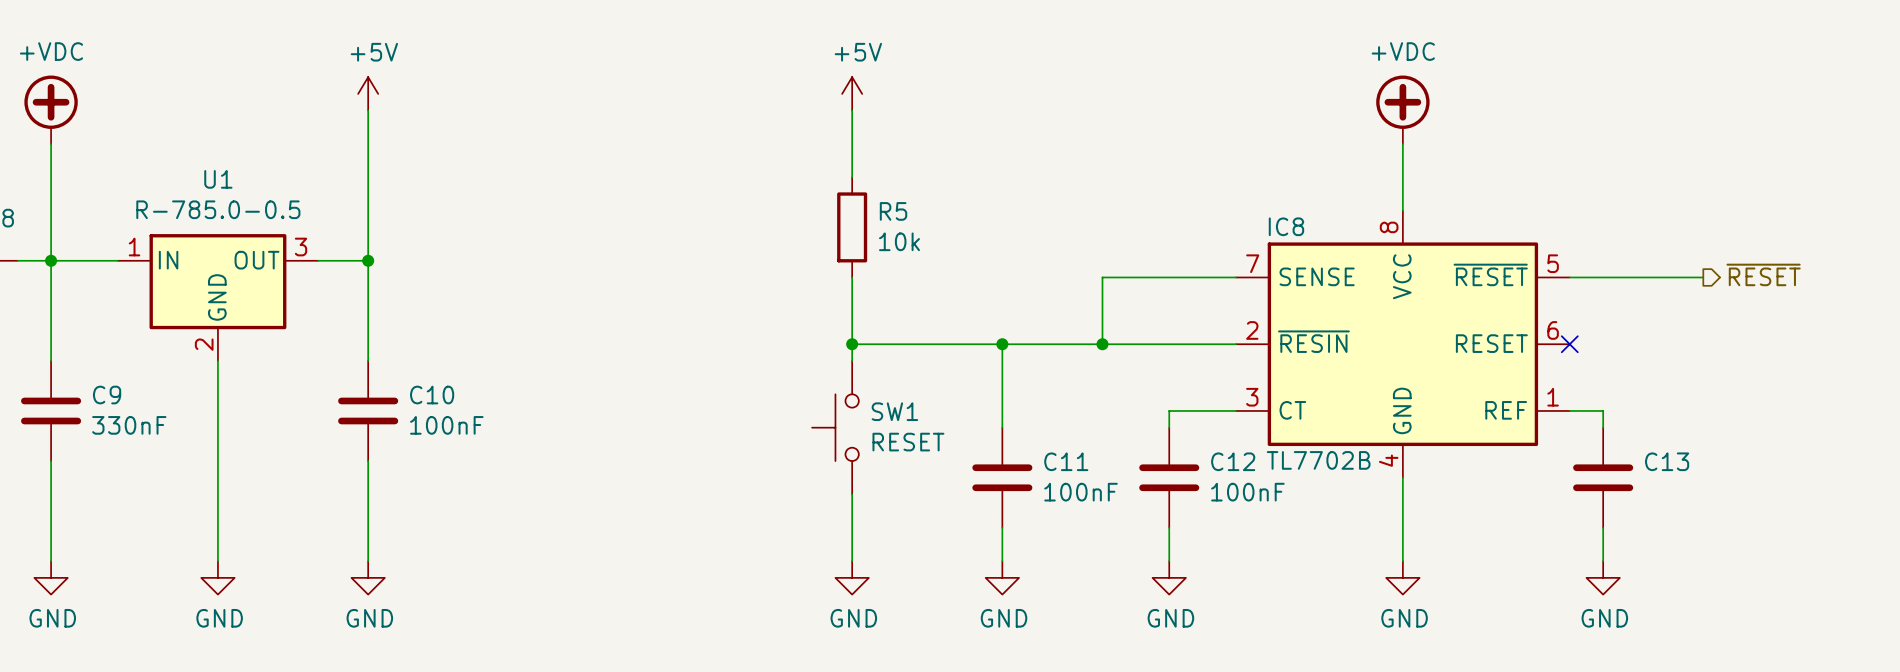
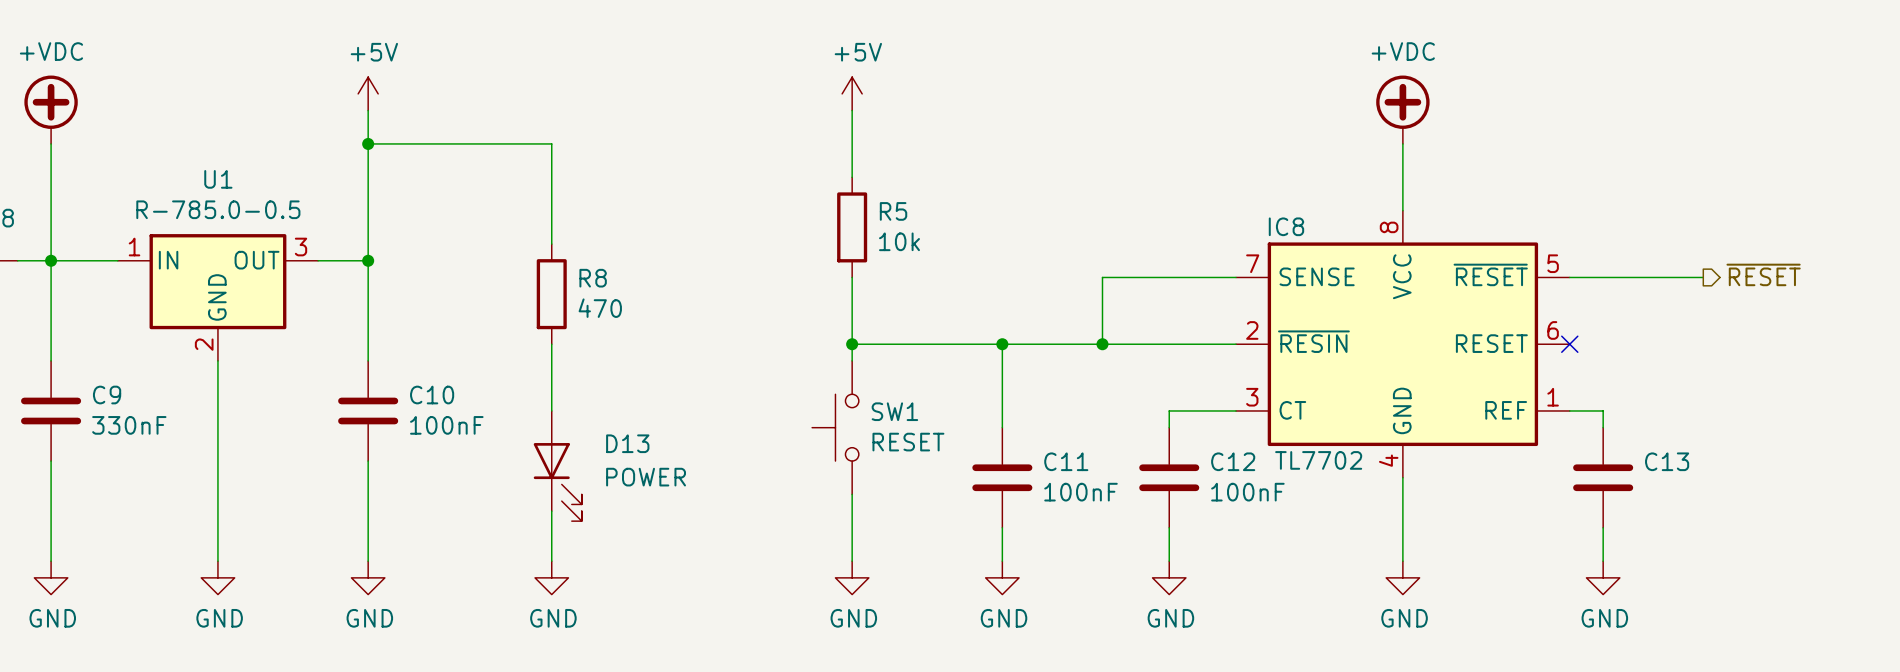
wire: none -> (368, 143) (551, 143) (551, 244)
junction: none -> (368, 143)
R8: none -> 470 (551, 294)
wire: none -> (551, 344) (551, 410)
IC8 value: TL7702B (1318, 460) -> TL7702 (1318, 460)
D13: none -> POWER (557, 466)
wire: none -> (551, 511) (551, 561)
power symbol: none -> GND (551, 577)

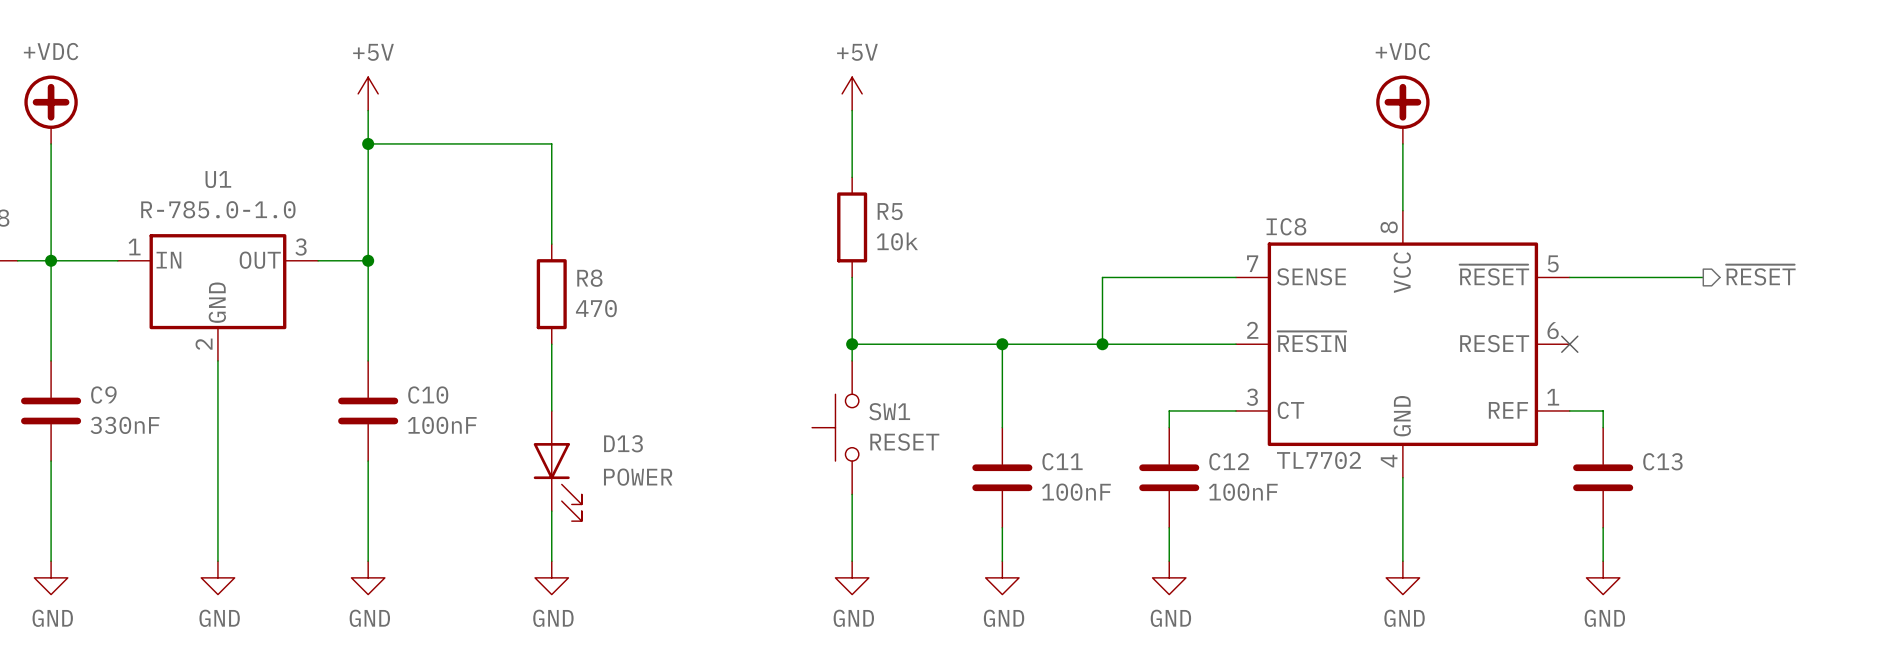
U1 value: R-785.0-0.5 (218, 209) -> R-785.0-1.0 (218, 209)

